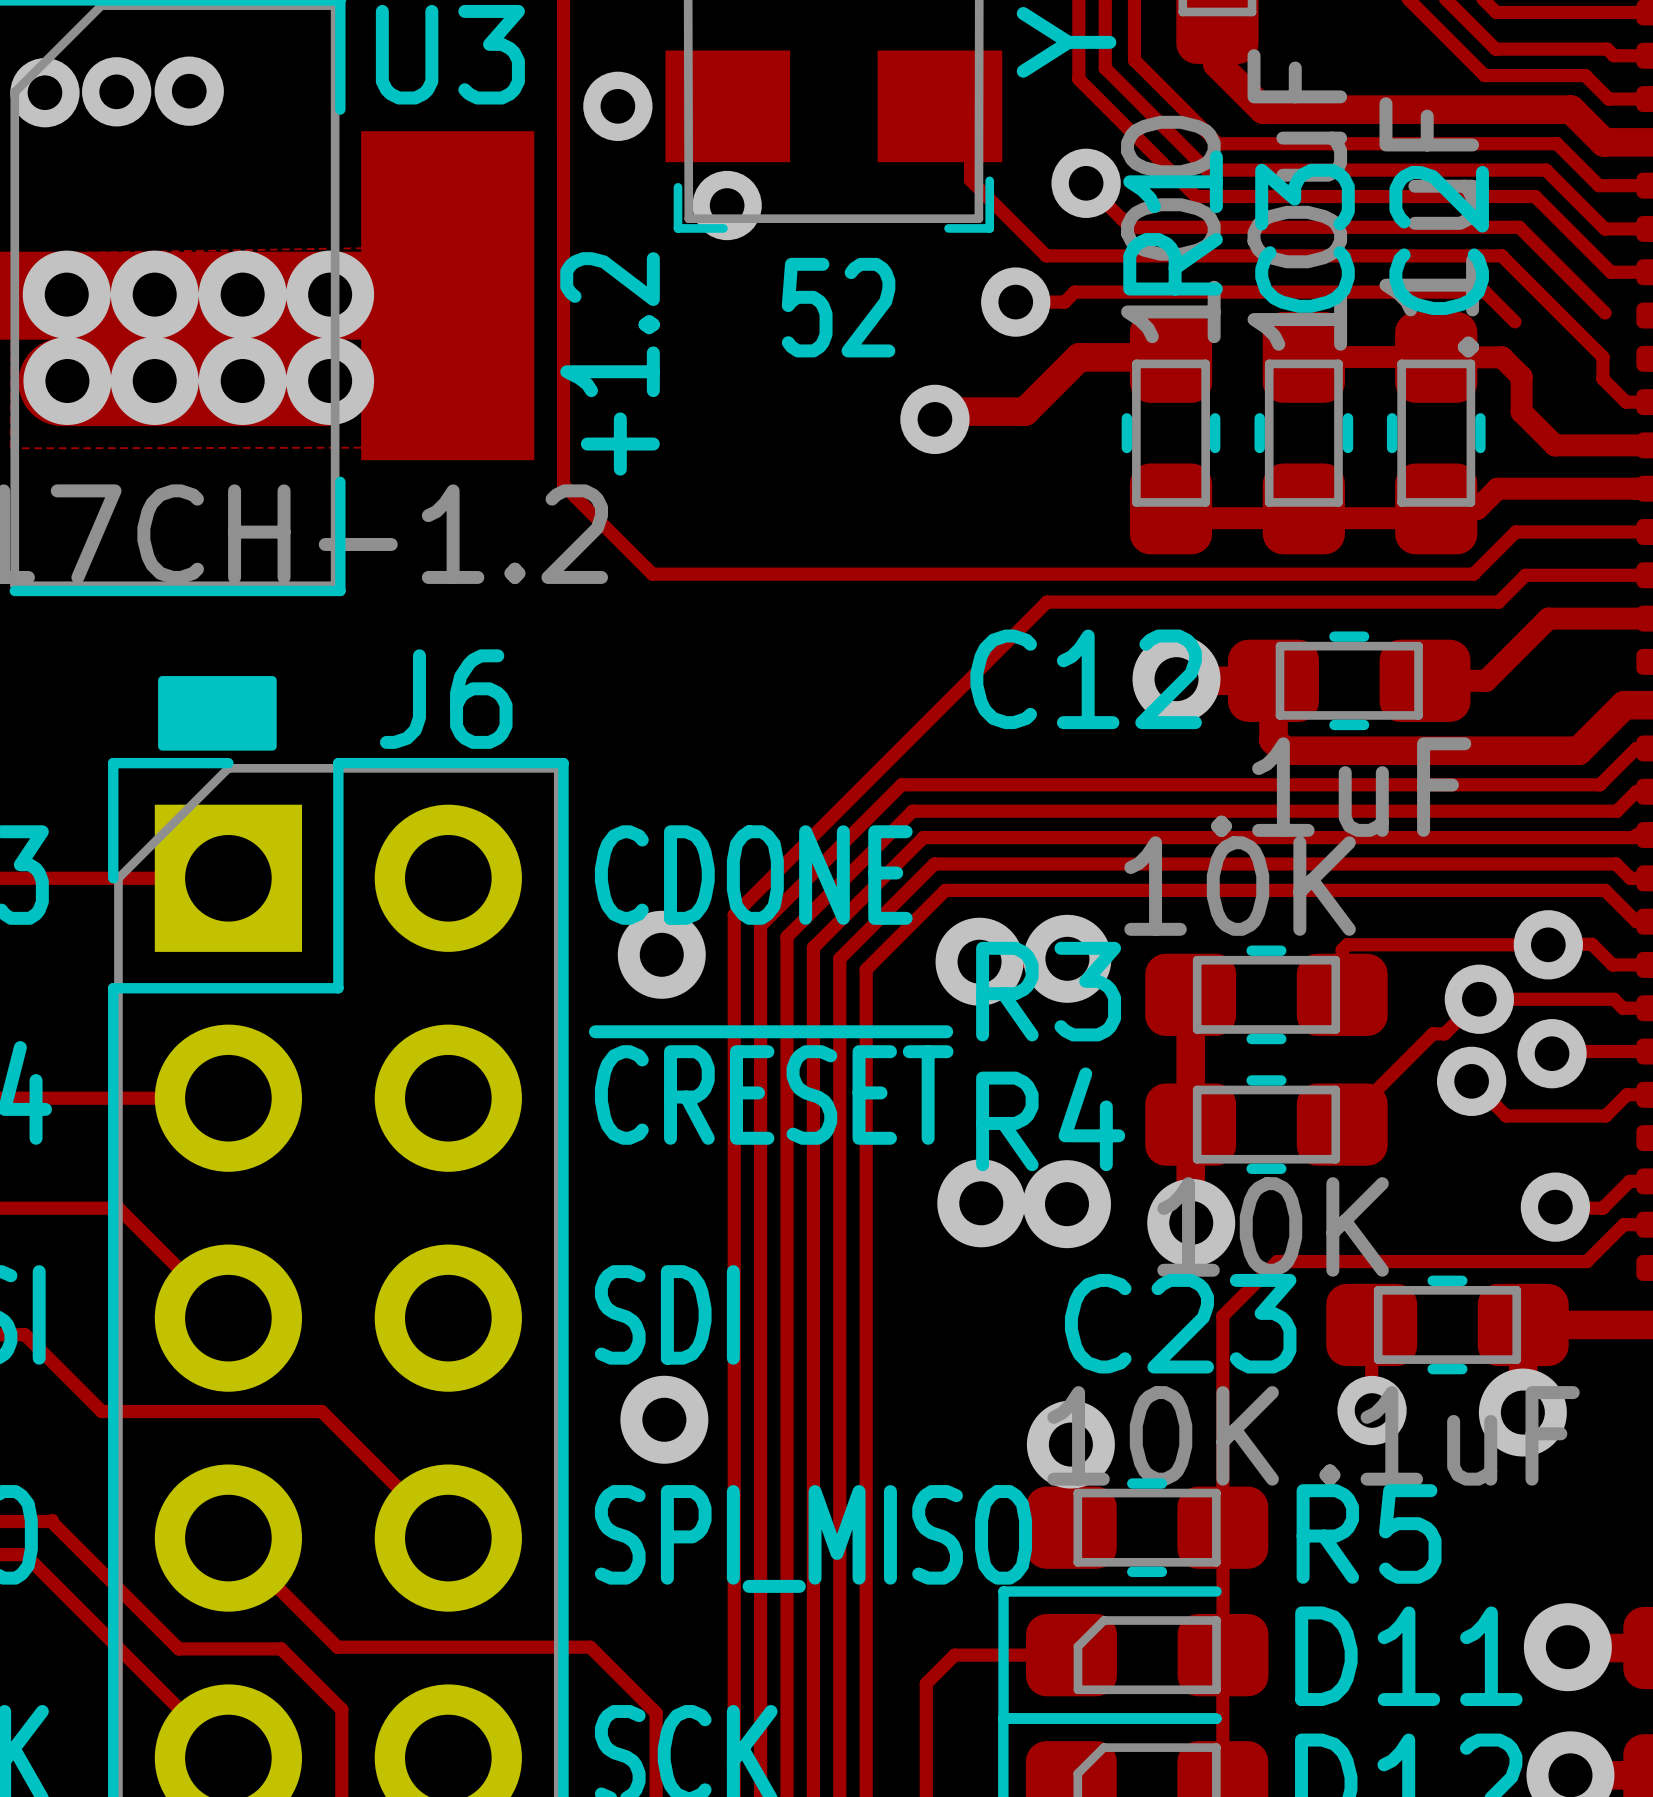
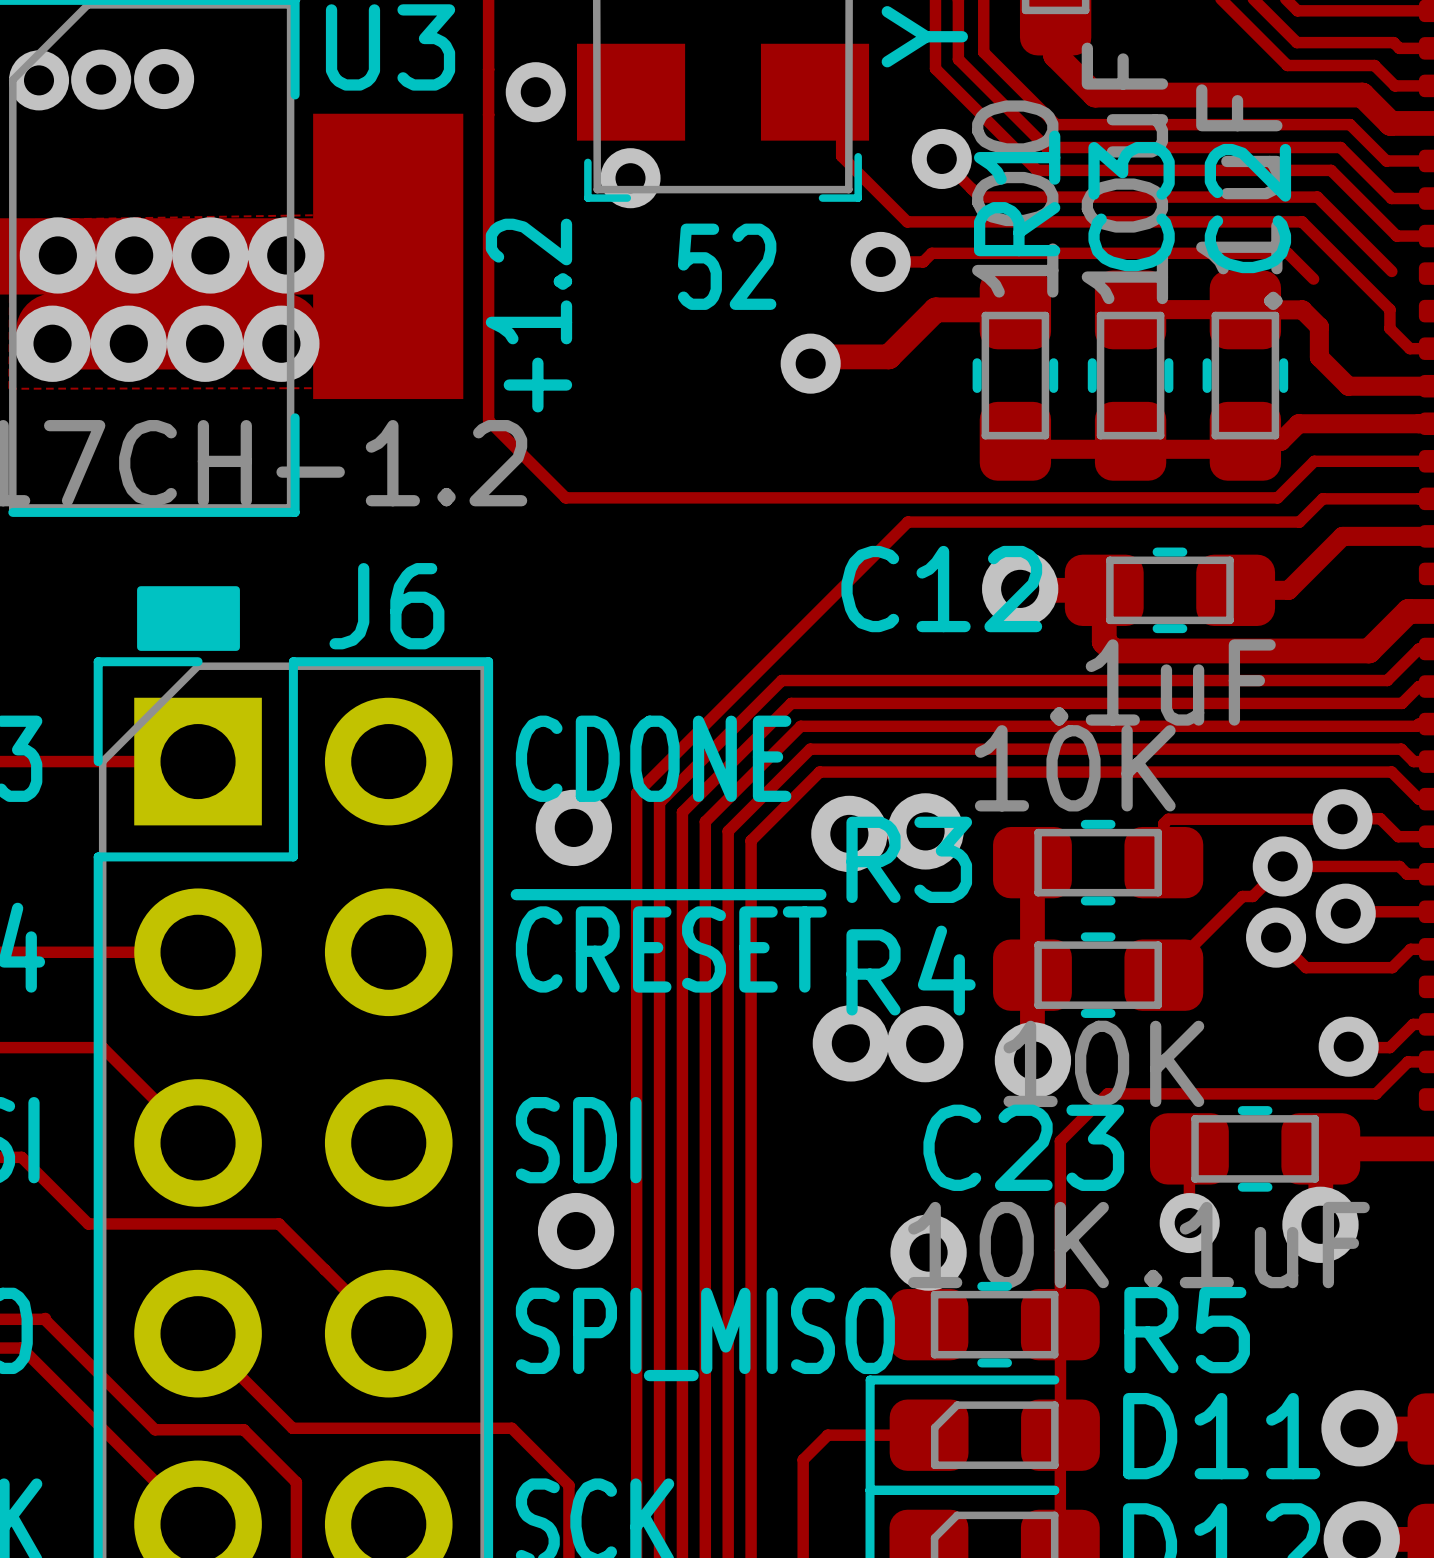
via position: (67, 381) -> (52, 343)
via position: (154, 381) -> (128, 343)
via position: (242, 381) -> (205, 343)
via position: (330, 381) -> (281, 343)

